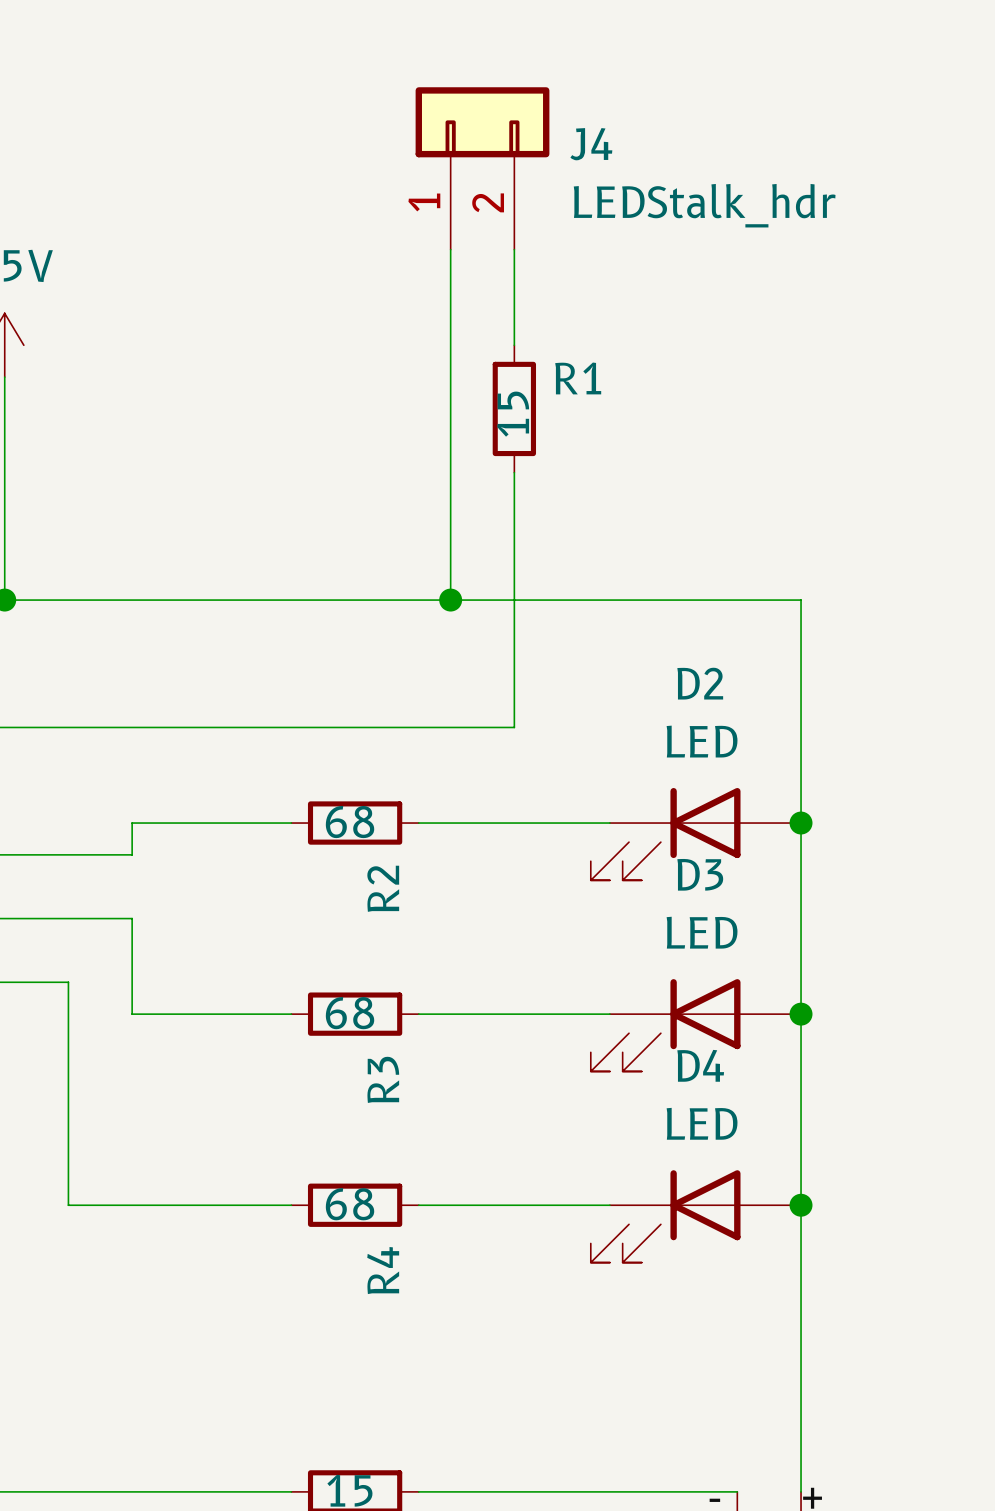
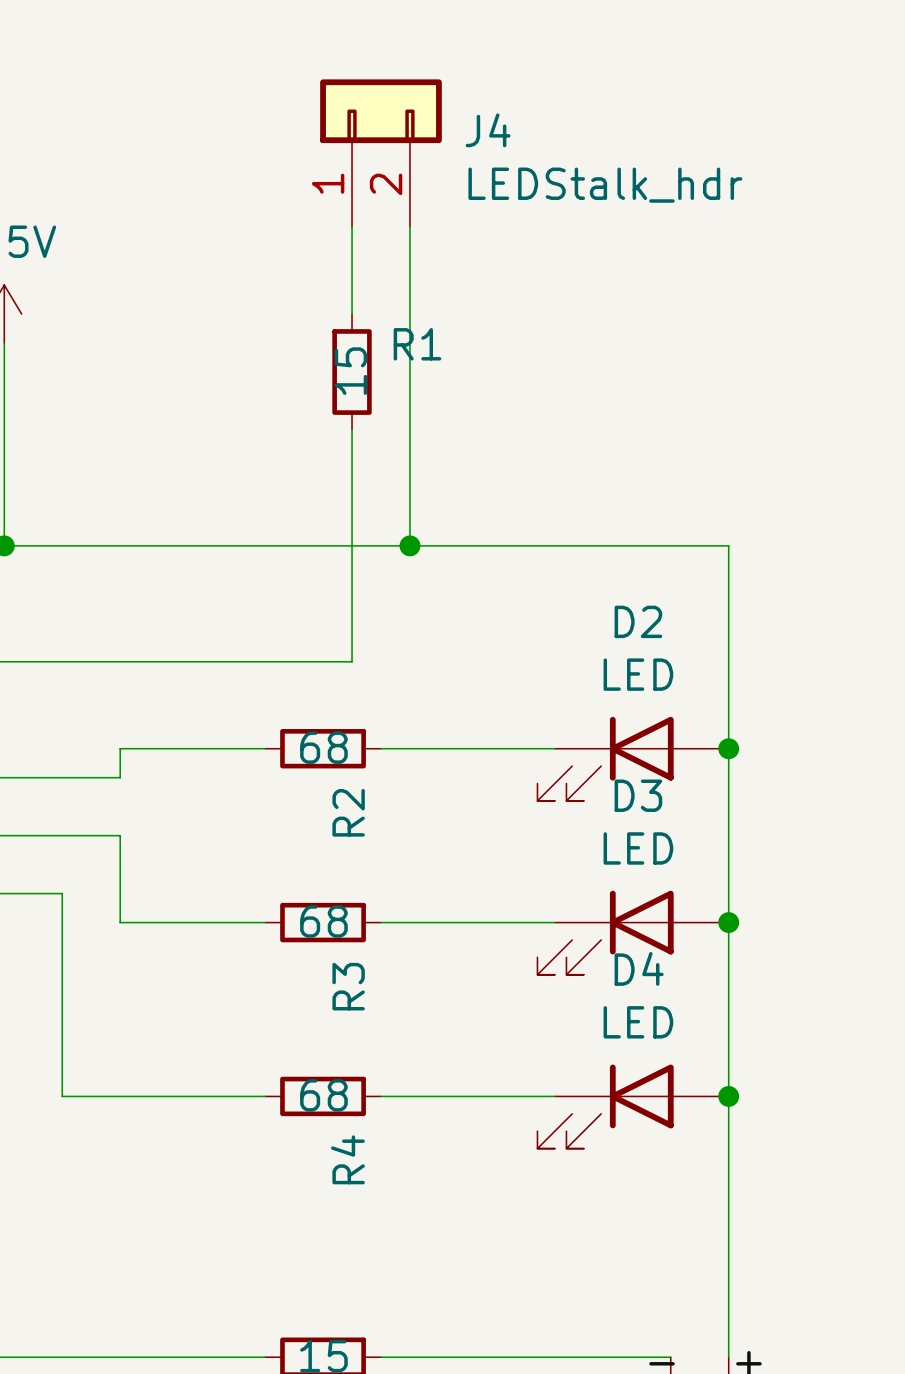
J4 position: (482, 168) -> (380, 153)
wire: (514, 249) (514, 345) -> (352, 227) (352, 314)
R1 position: (514, 408) -> (352, 372)
wire: (514, 472) (514, 727) (386, 727) -> (352, 429) (352, 661)

